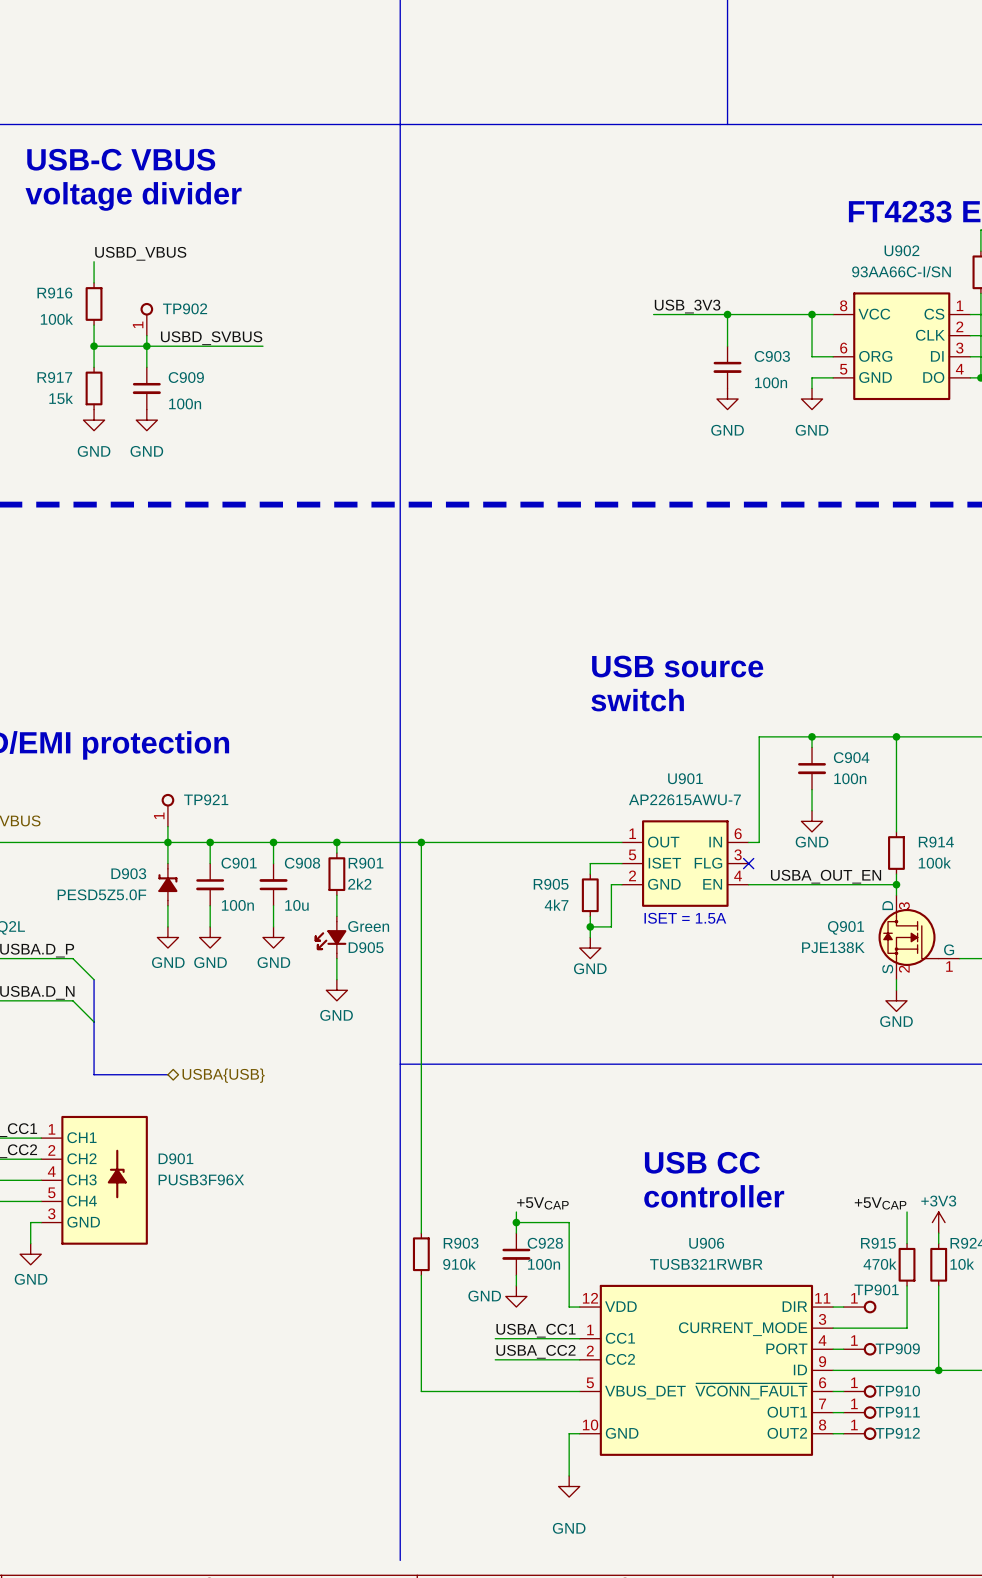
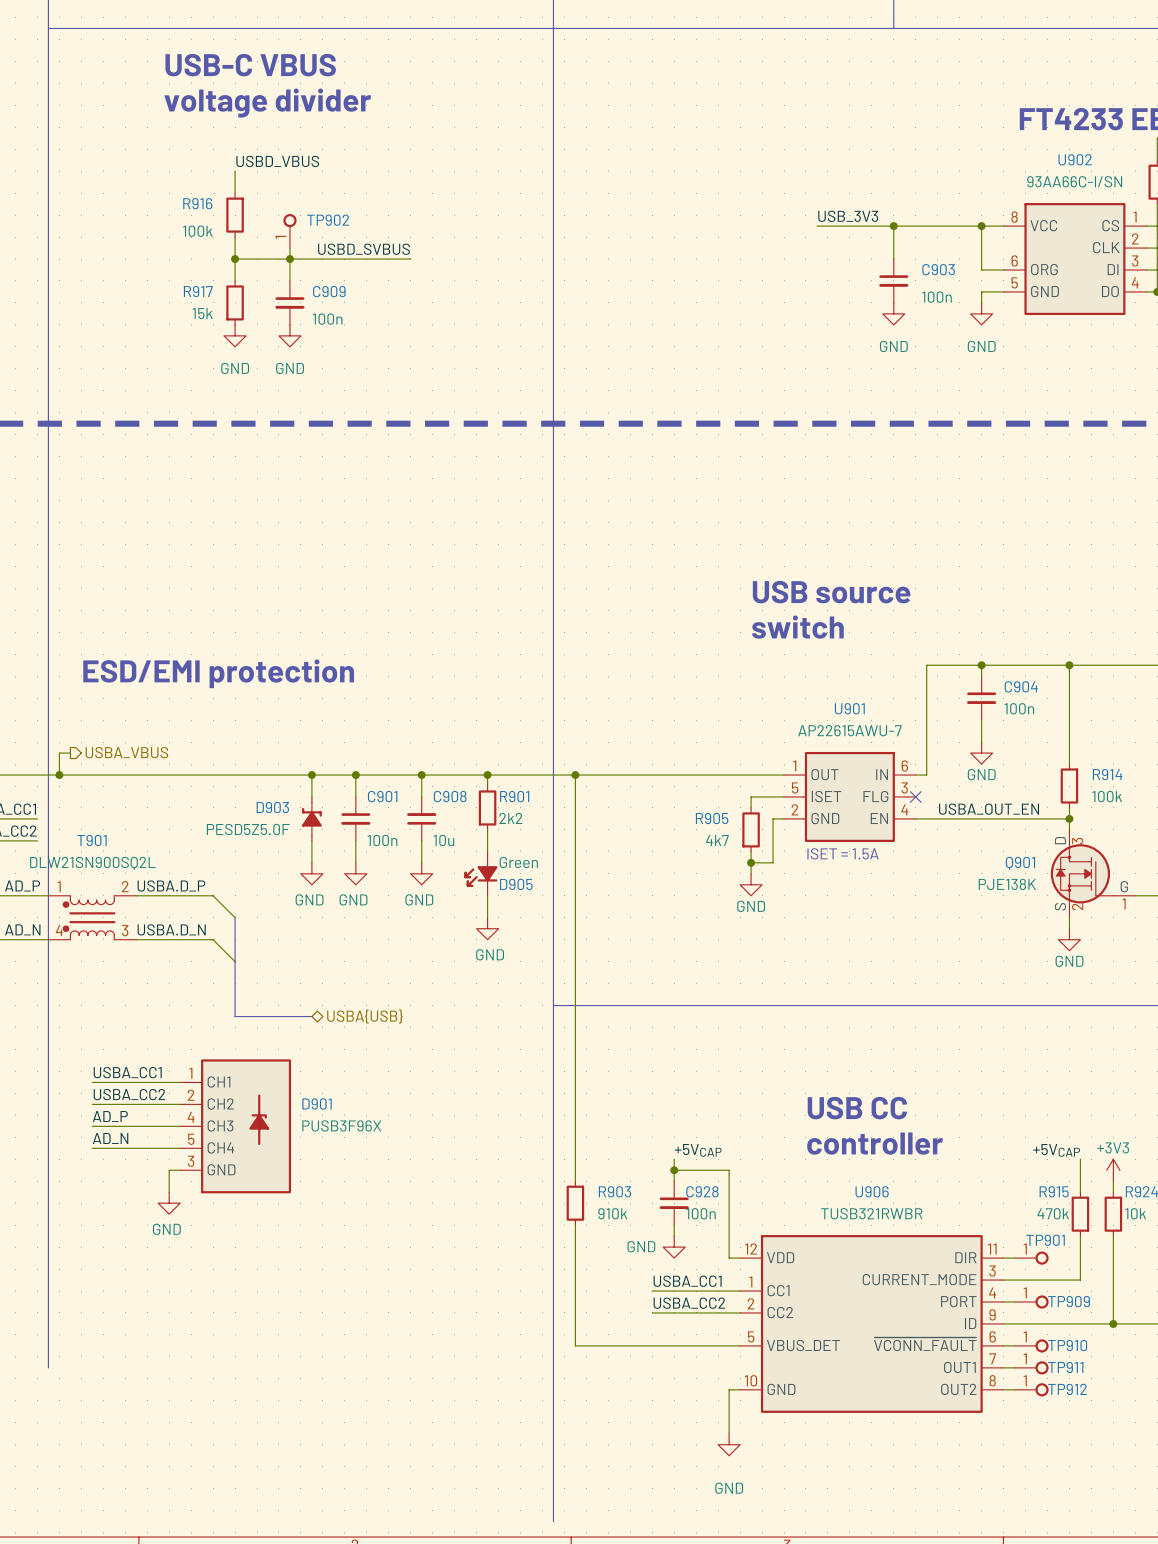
TP921: (167, 810) -> none
wire: (167, 826) (167, 842) -> none

